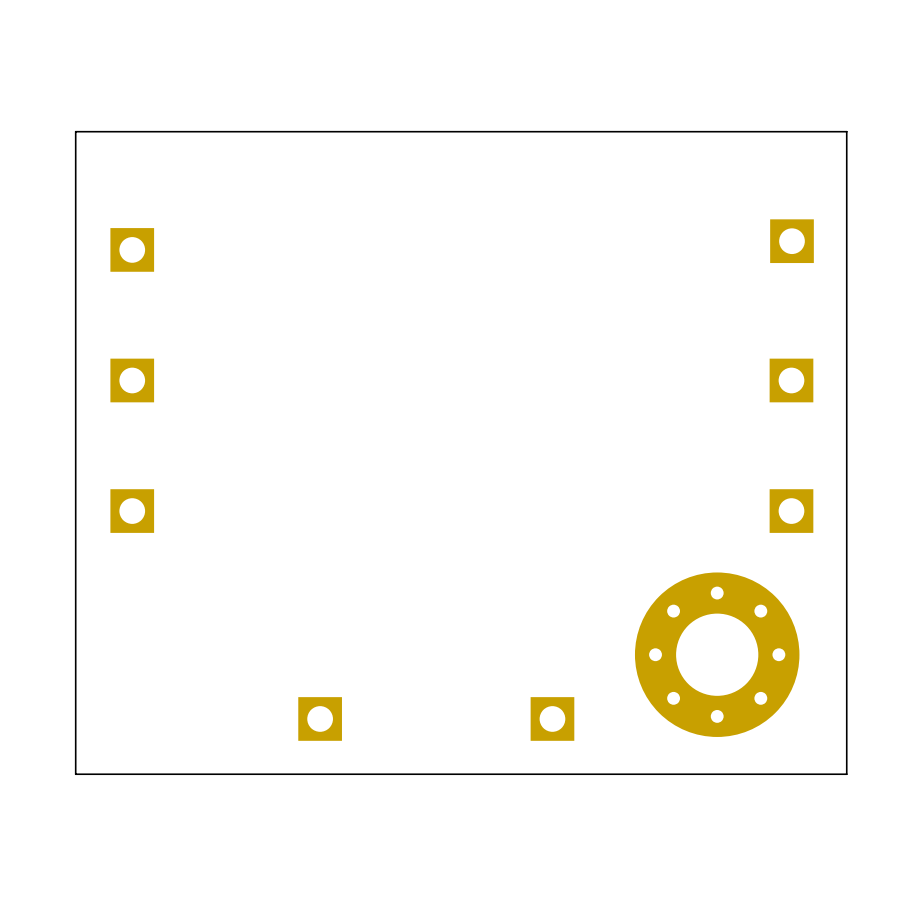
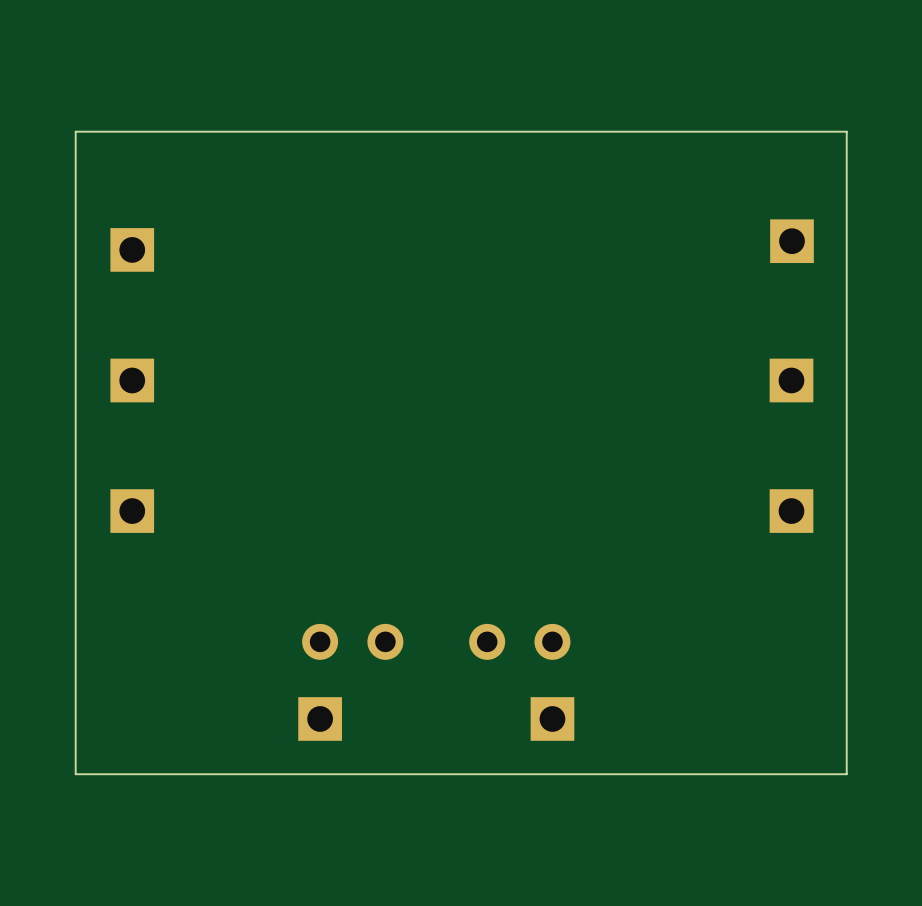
part: none -> (352, 641)
part: none -> (519, 641)
part: (717, 654) -> none

